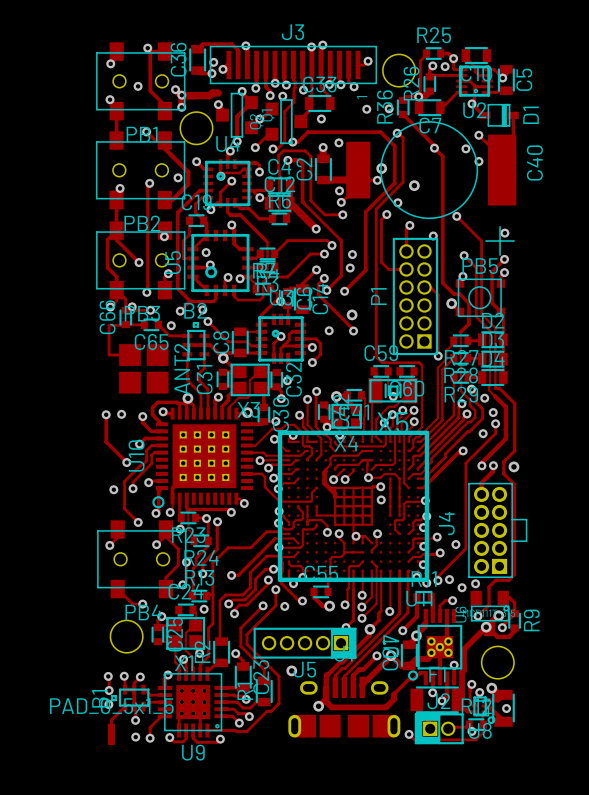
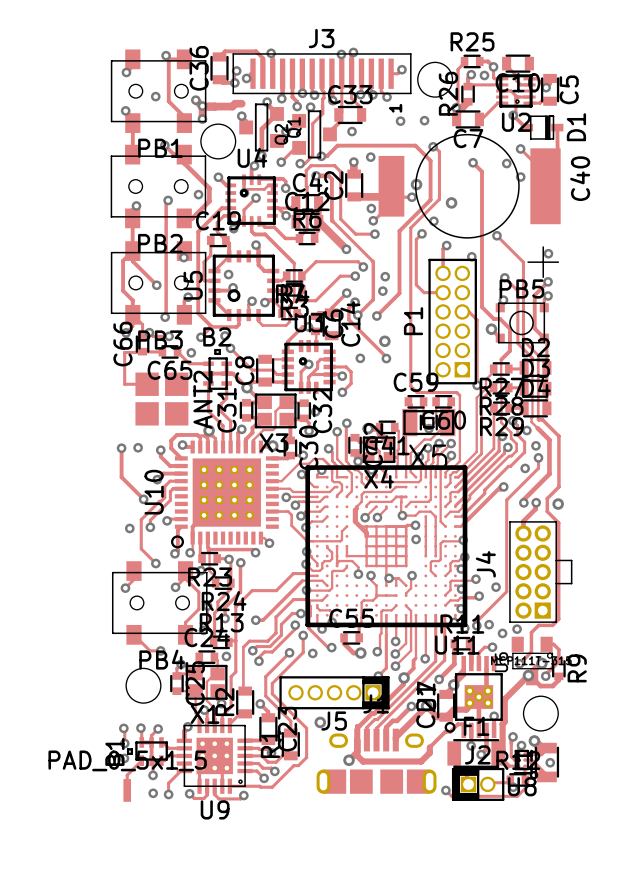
track: (418, 96) (406, 96) (403, 100) -> none
R36: (403, 107) -> none
track: (403, 114) (434, 145) (434, 148) -> none

